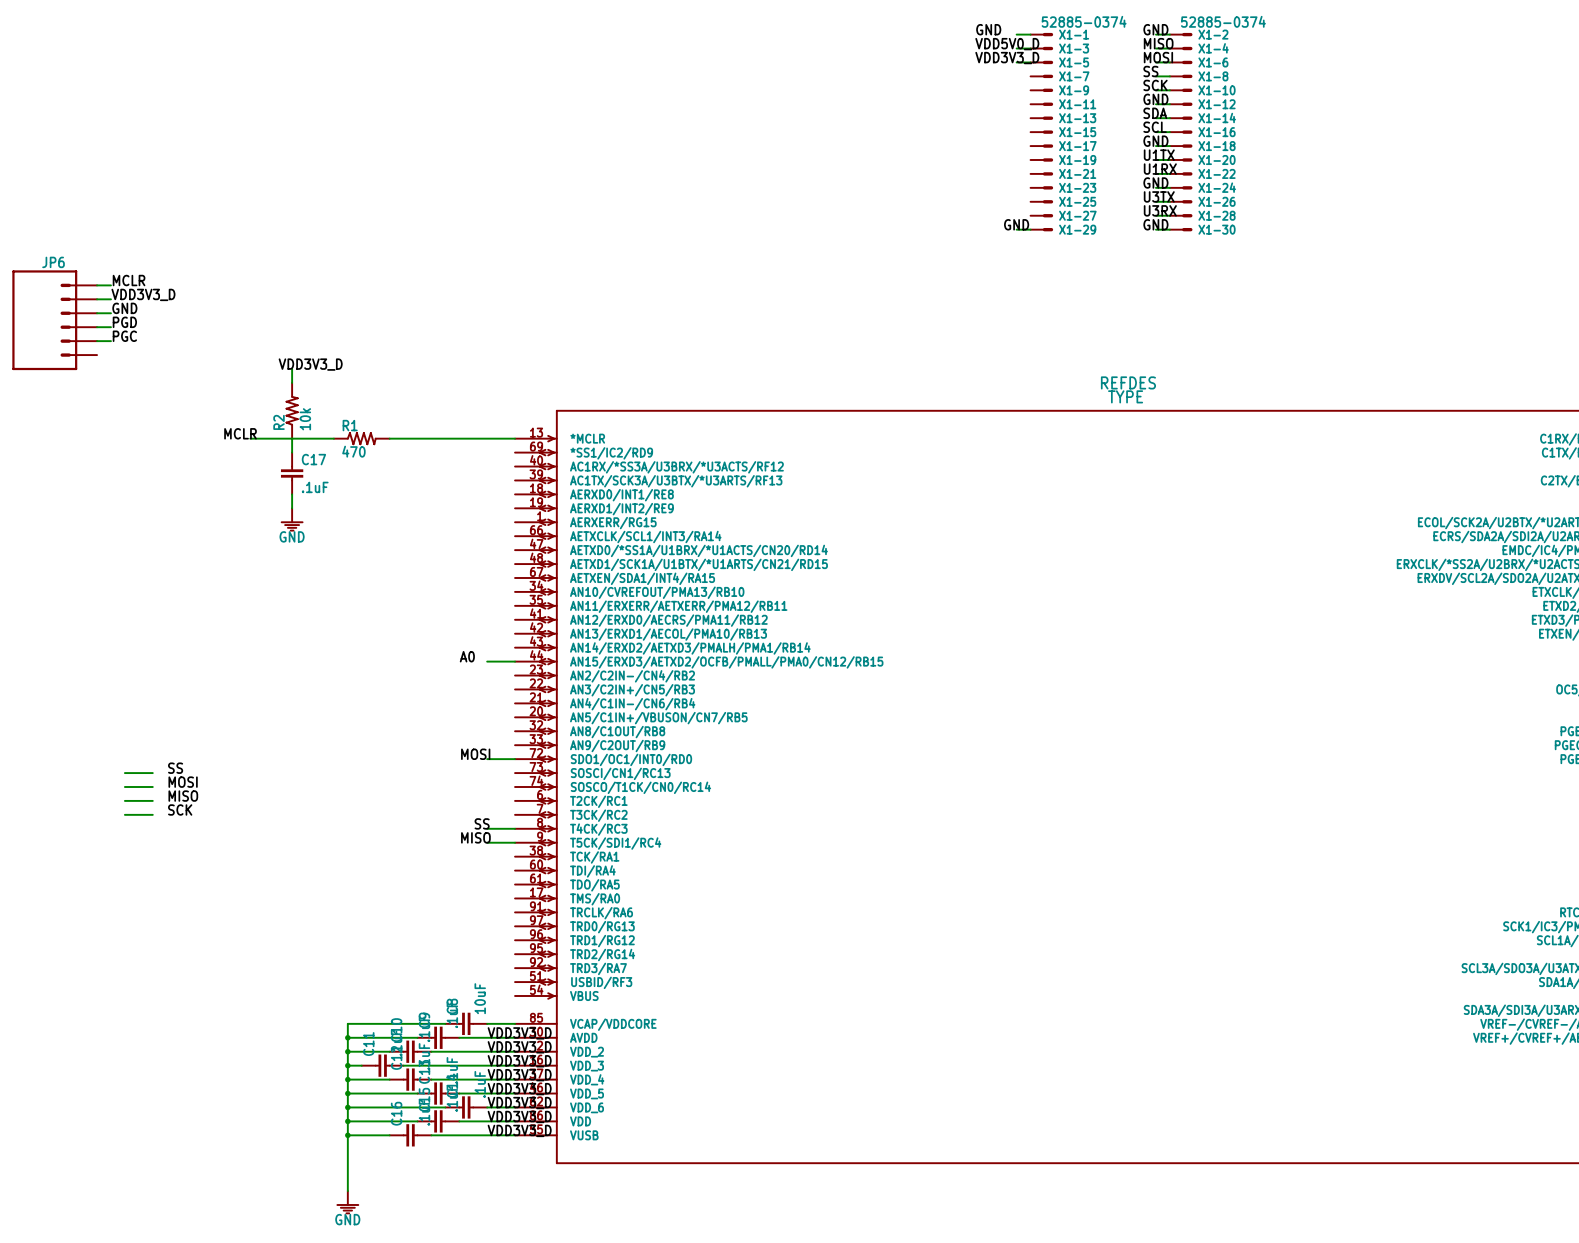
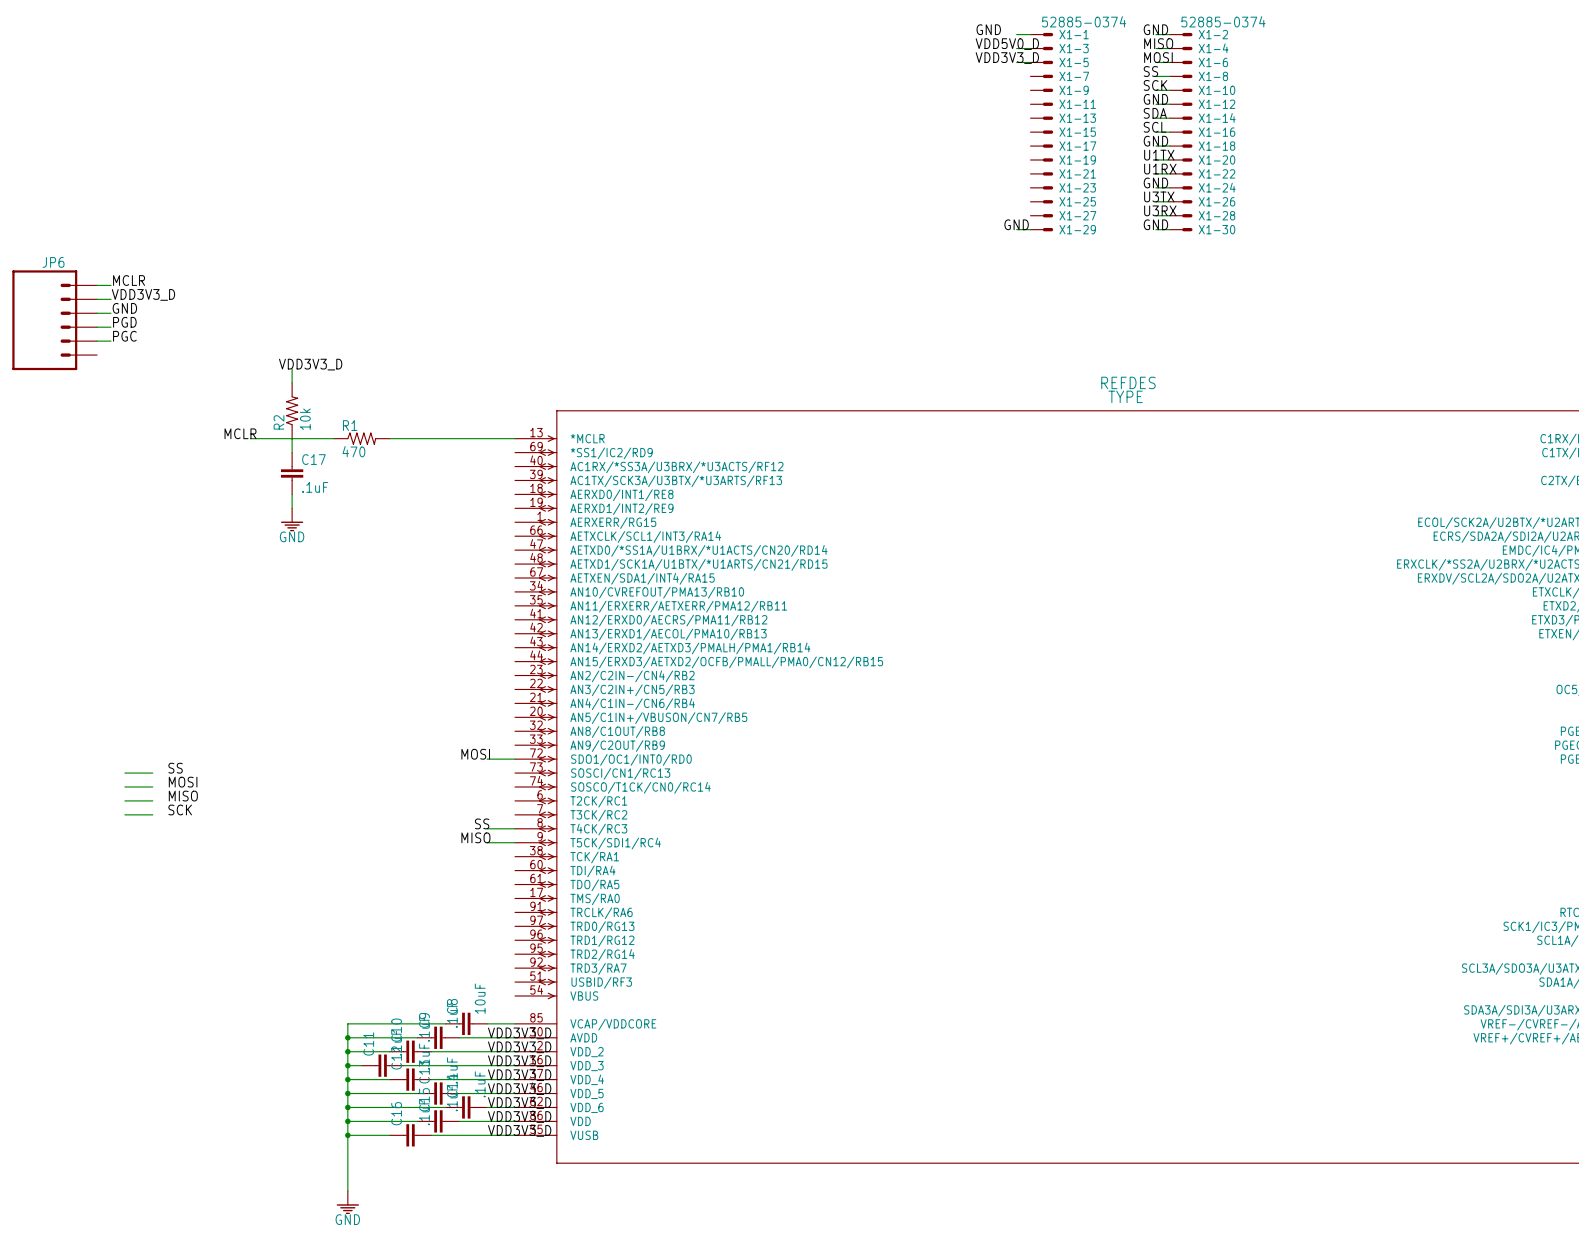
label: A0 (467, 656) -> none
wire: (487, 661) (515, 661) -> none

